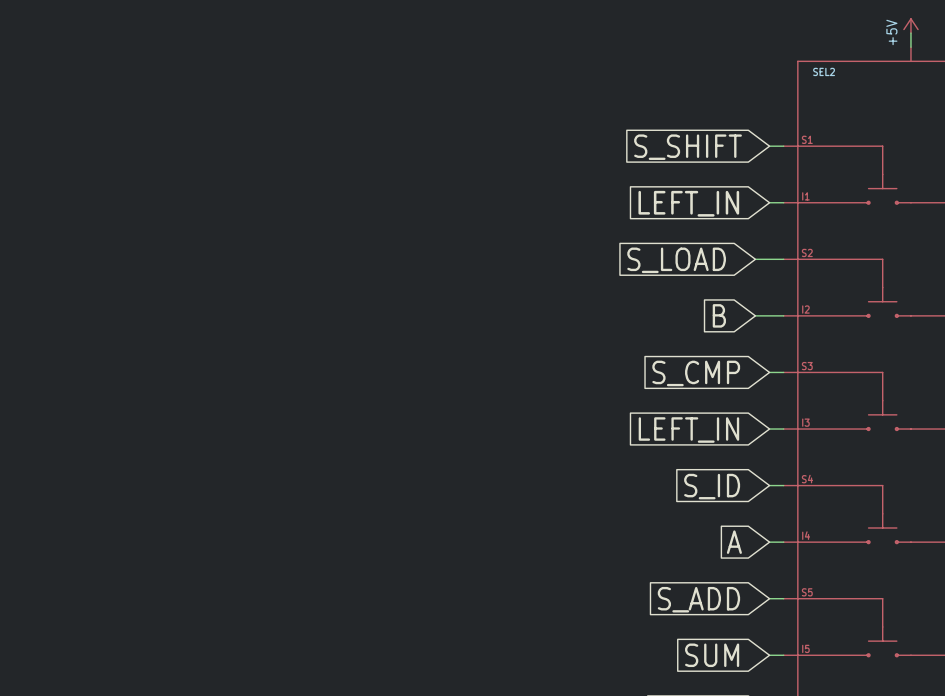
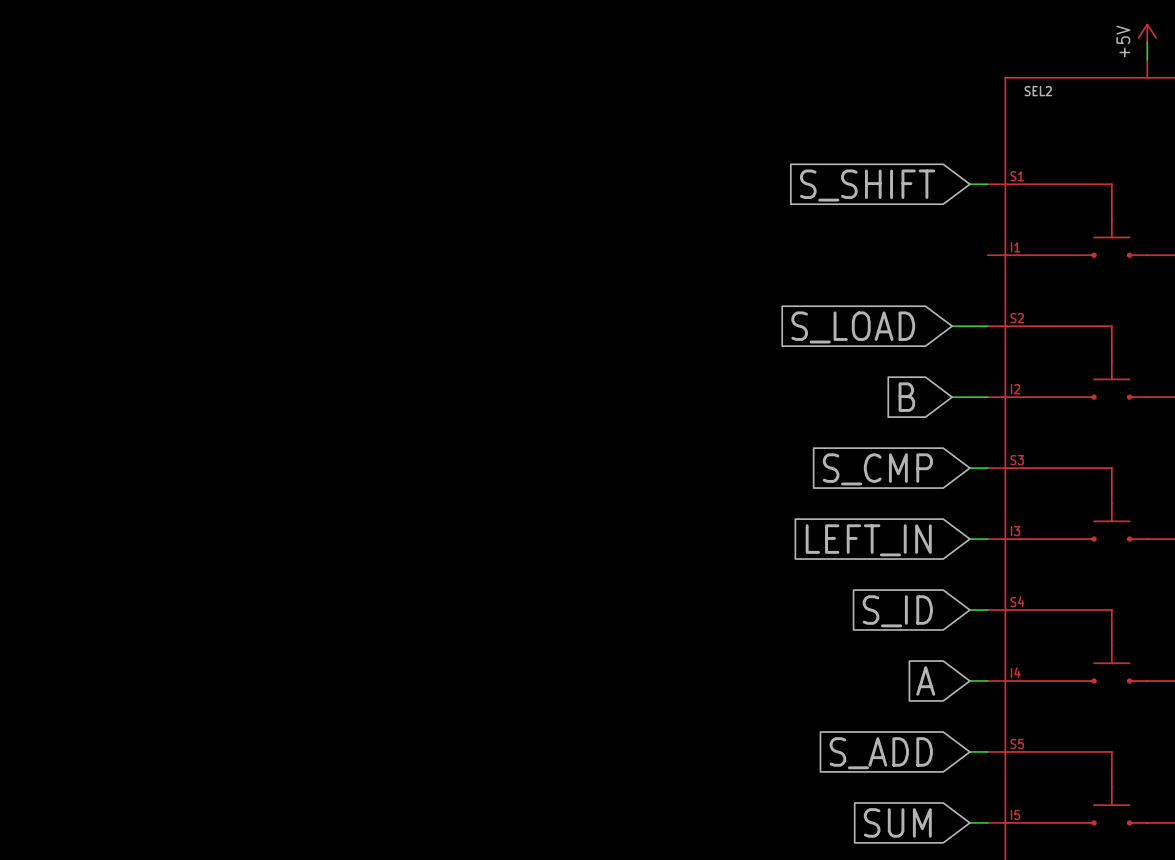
wire: (769, 202) (783, 202) -> none
global label: LEFT_IN (688, 203) -> none

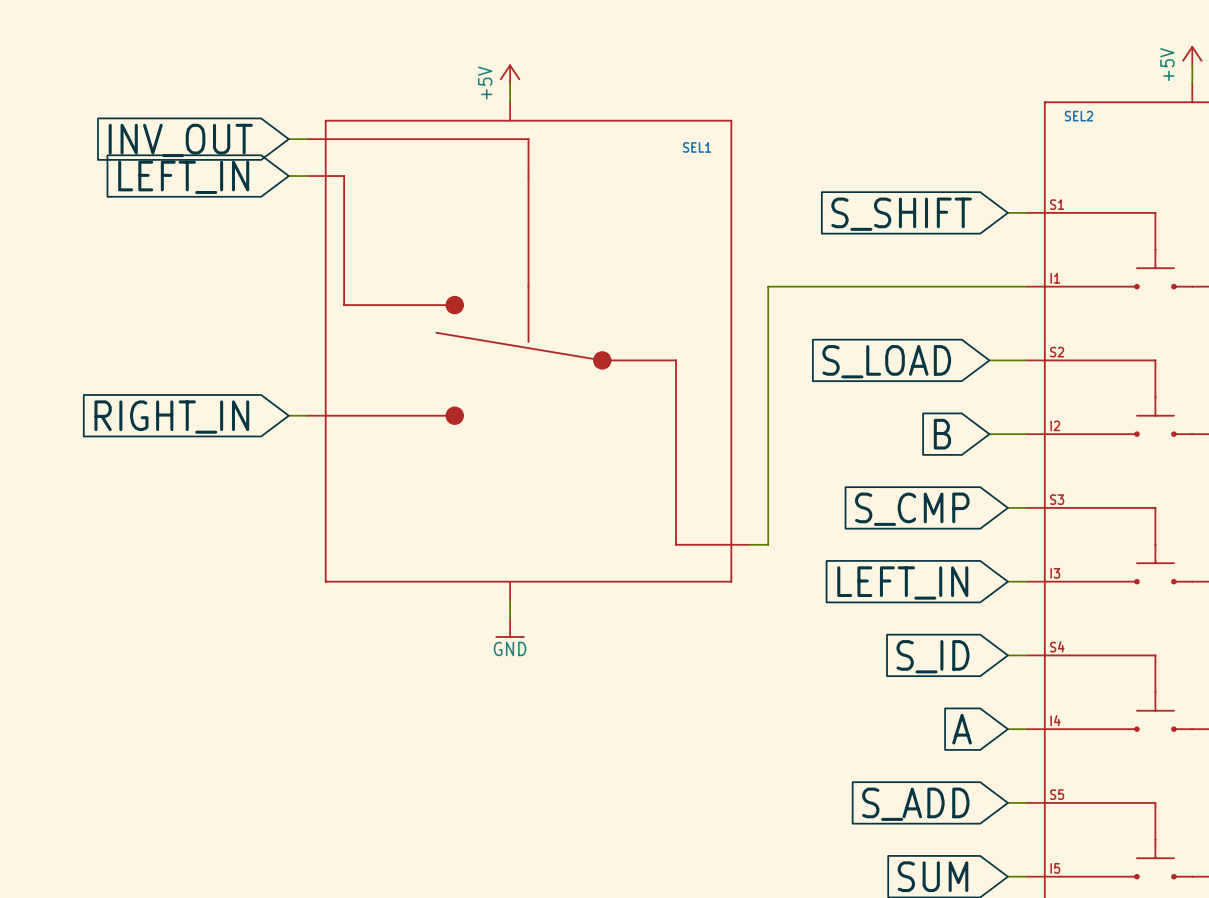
power symbol: none -> +5V (510, 74)
wire: none -> (510, 83) (510, 102)
wire: none -> (288, 139) (307, 139)
global label: none -> INV_OUT (180, 140)
wire: none -> (288, 176) (307, 176)
global label: none -> LEFT_IN (183, 177)
wire: none -> (1026, 286) (768, 286) (768, 544) (749, 544)
SEL1: none -> (528, 351)
wire: none -> (288, 415) (307, 415)
global label: none -> RIGHT_IN (171, 417)
wire: none -> (510, 600) (510, 618)
power symbol: none -> GND (510, 628)

